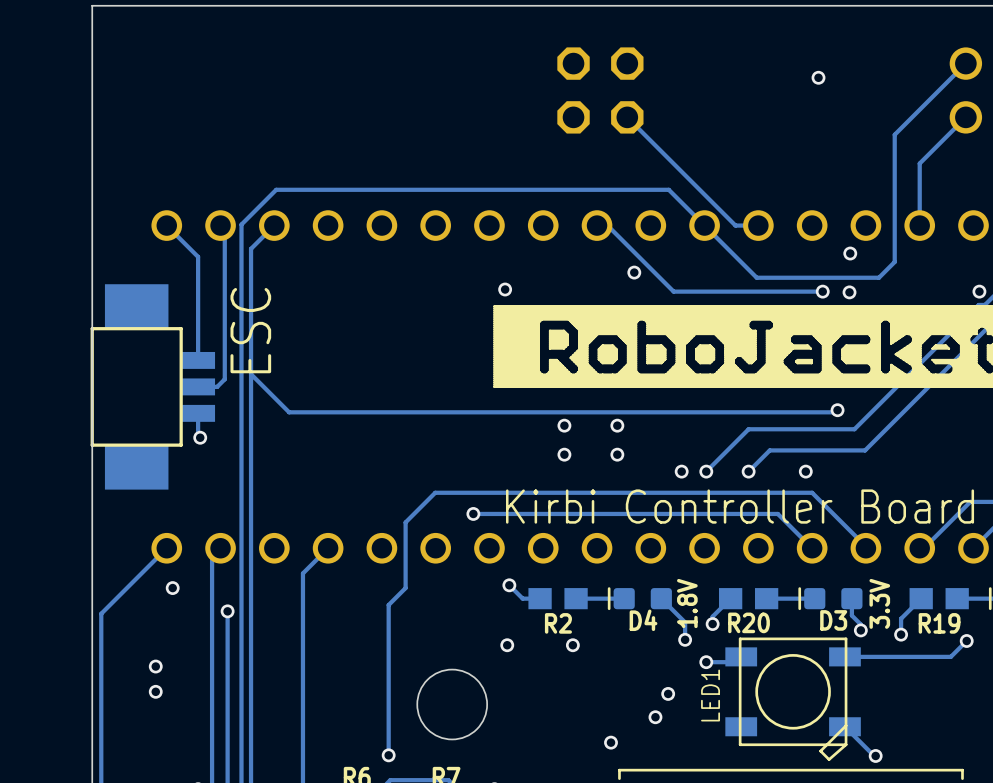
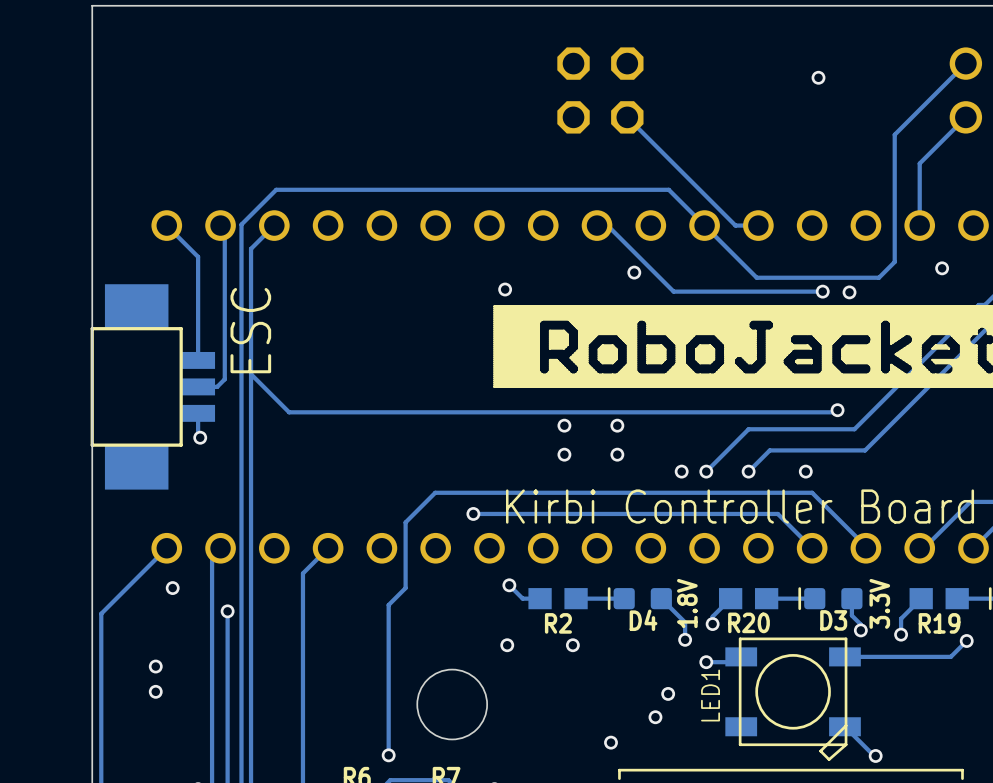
via: (850, 253) -> none
via position: (979, 291) -> (942, 268)

